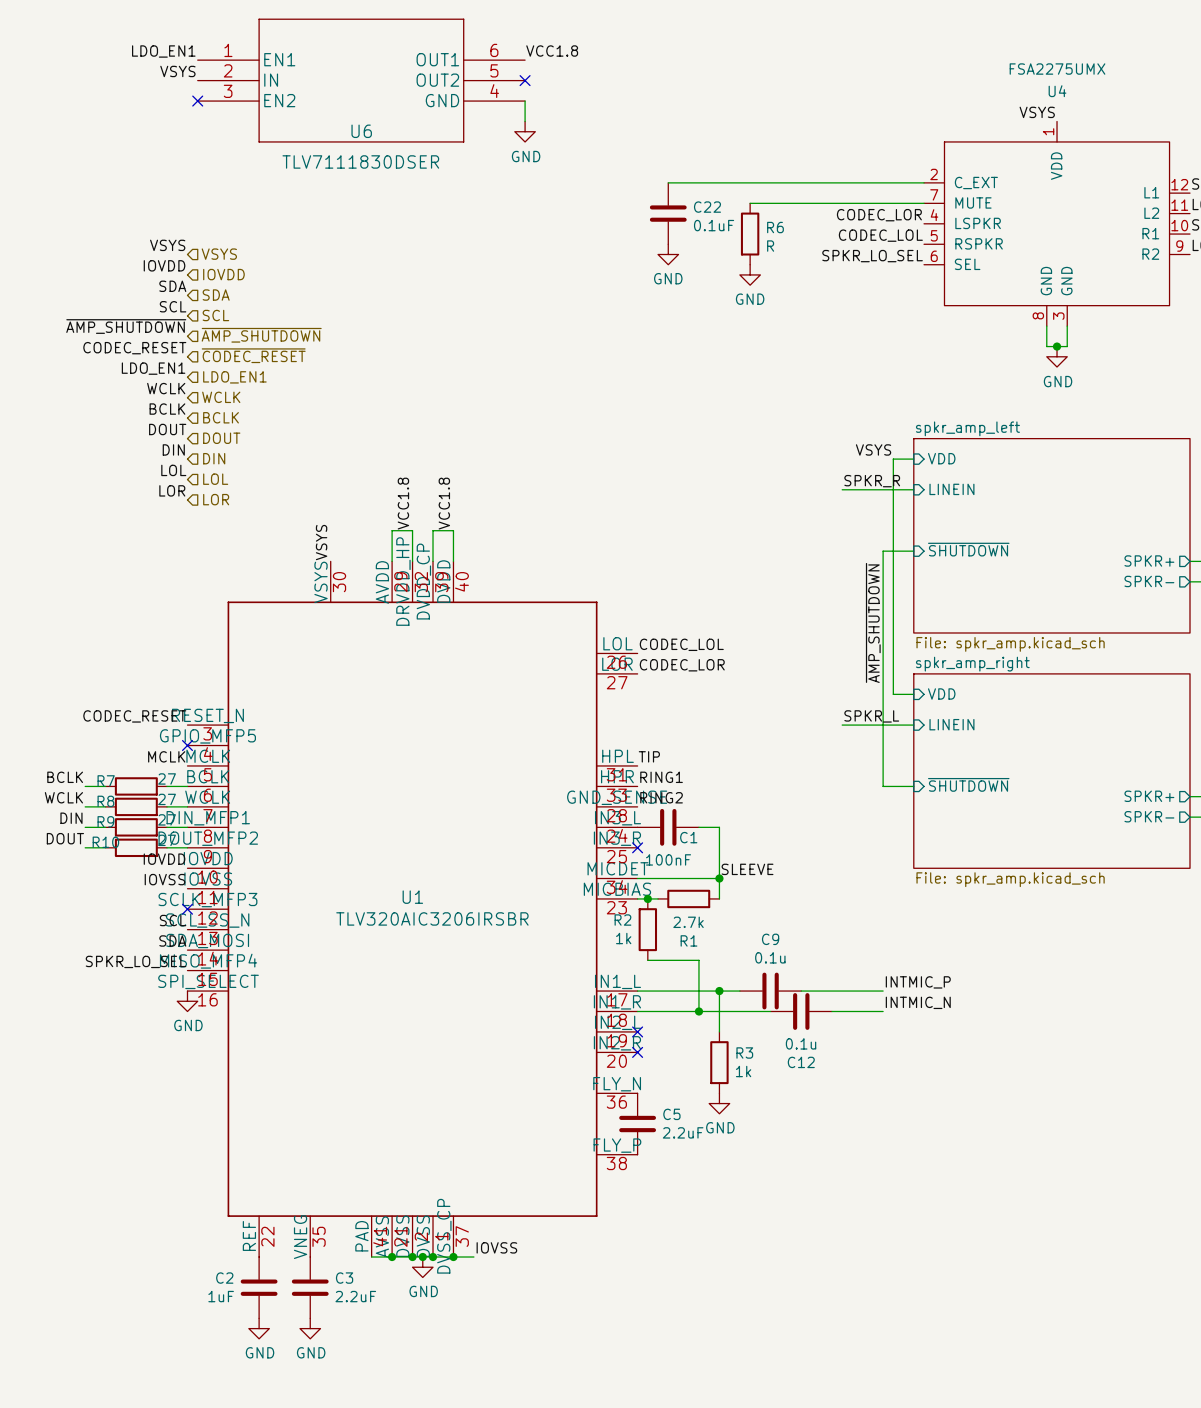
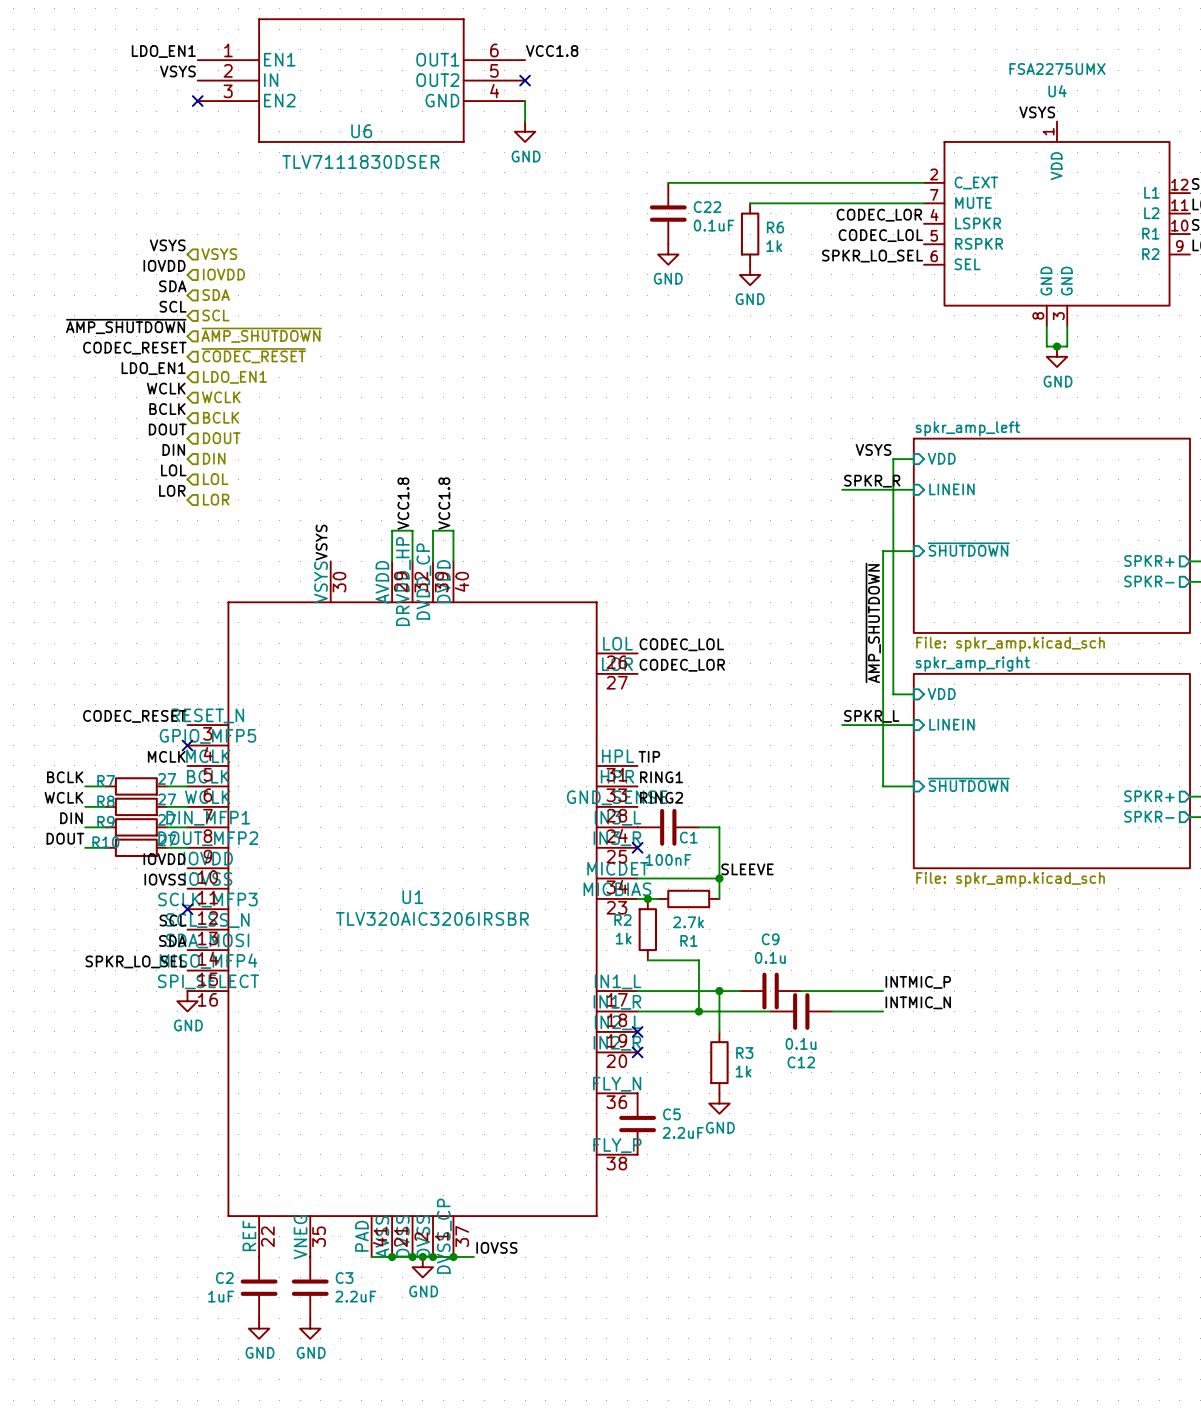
R6 value: R (770, 246) -> 1k (774, 246)

